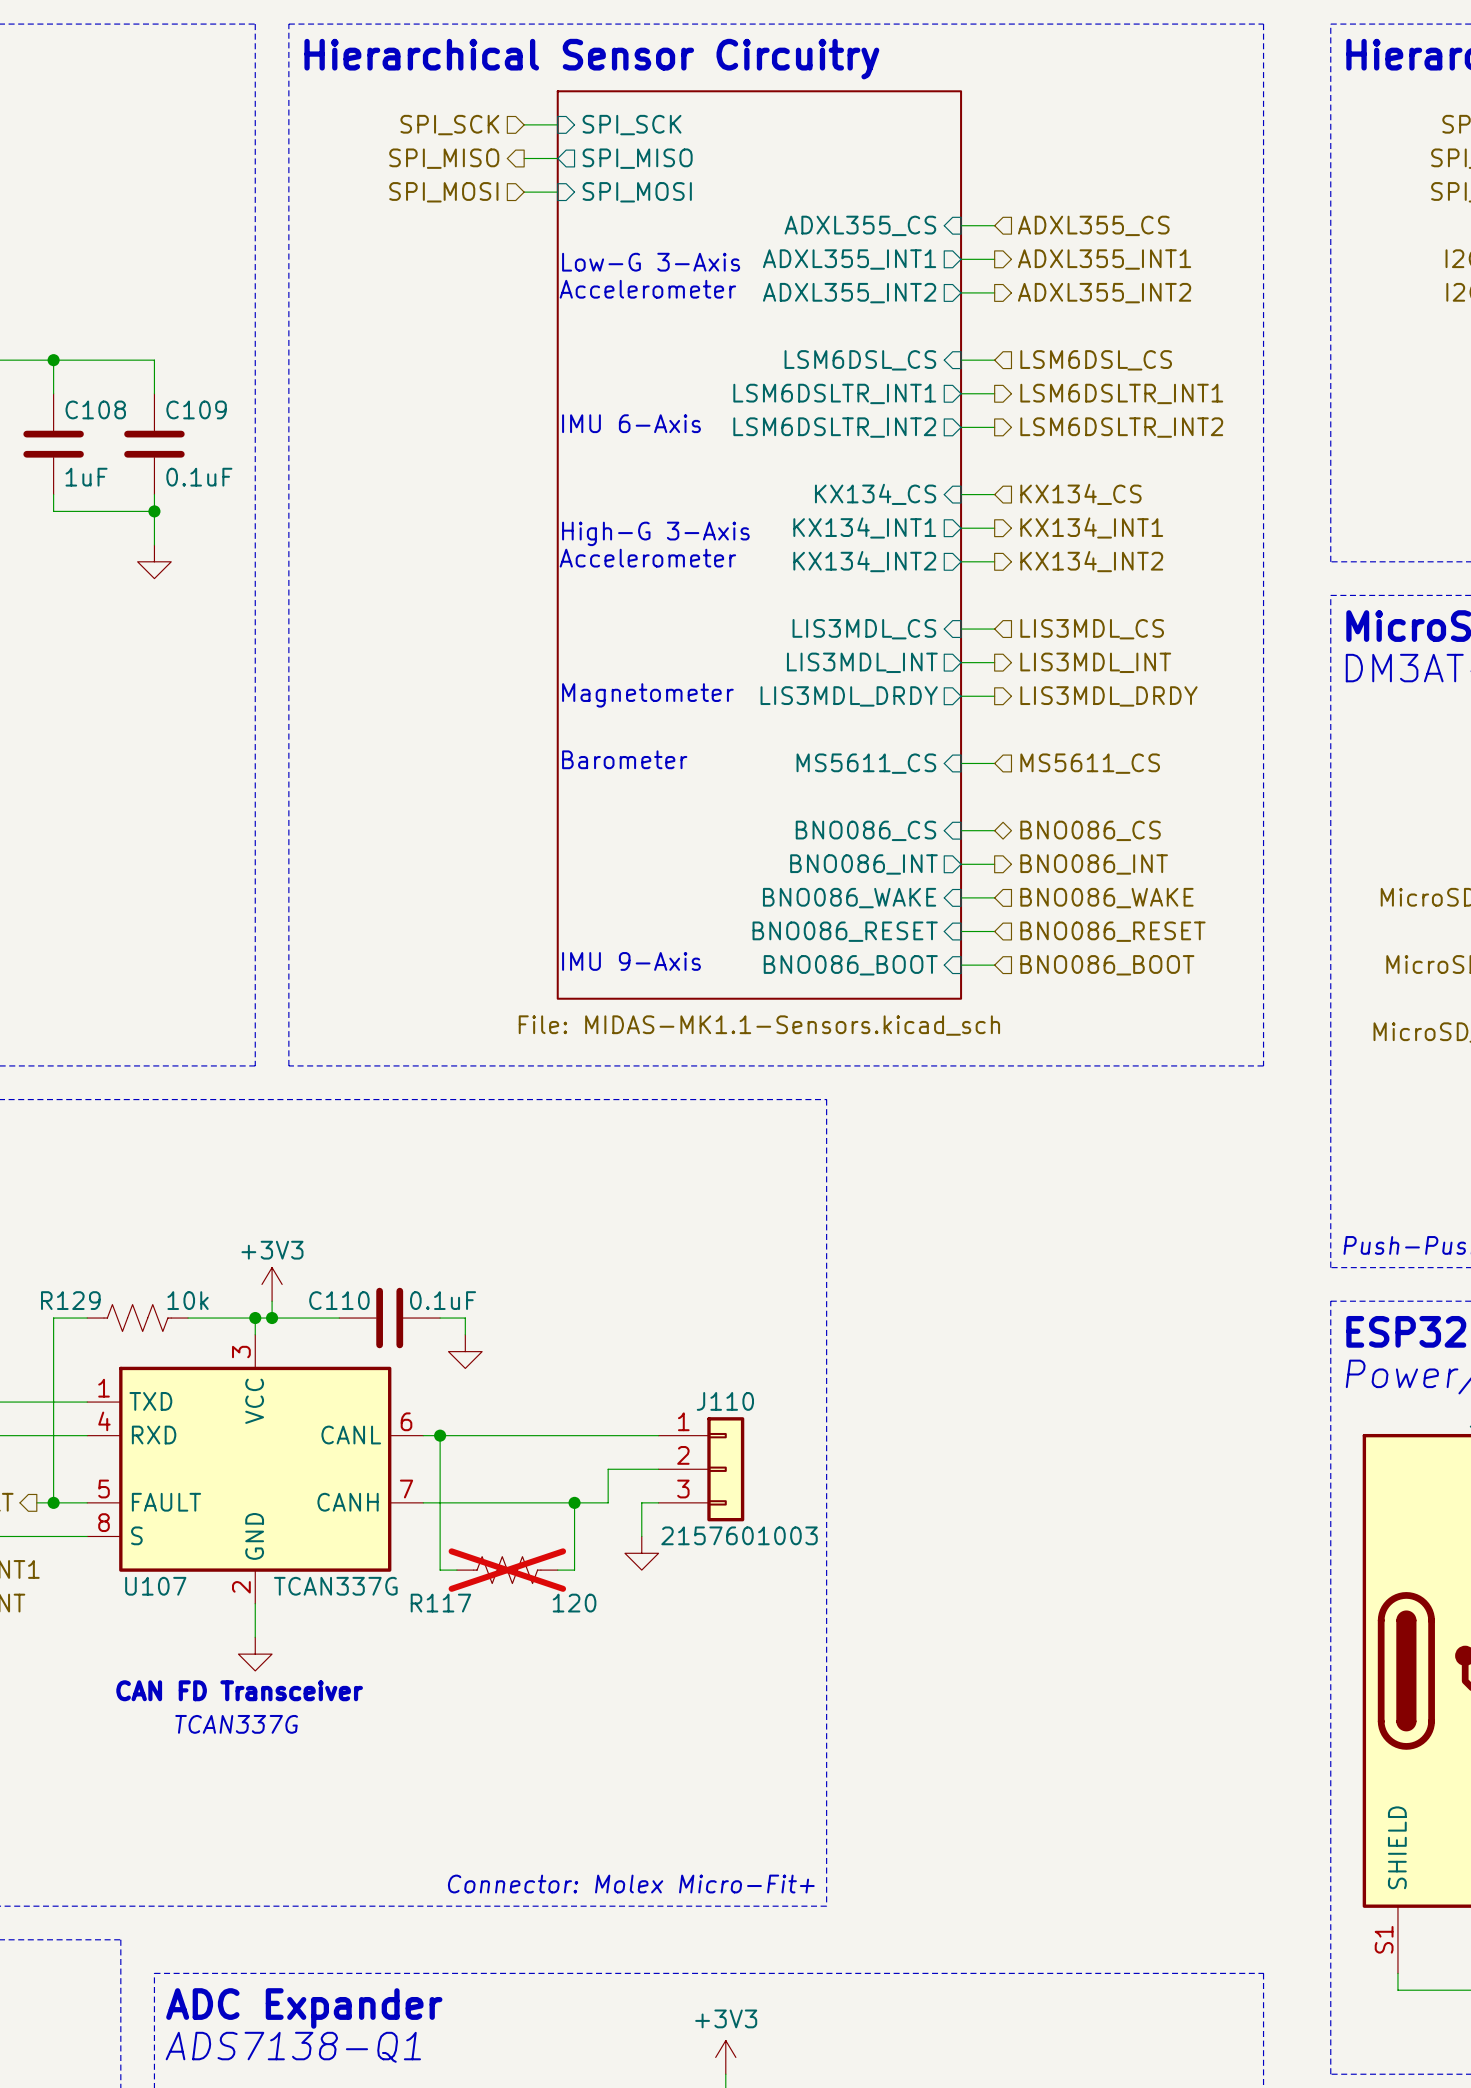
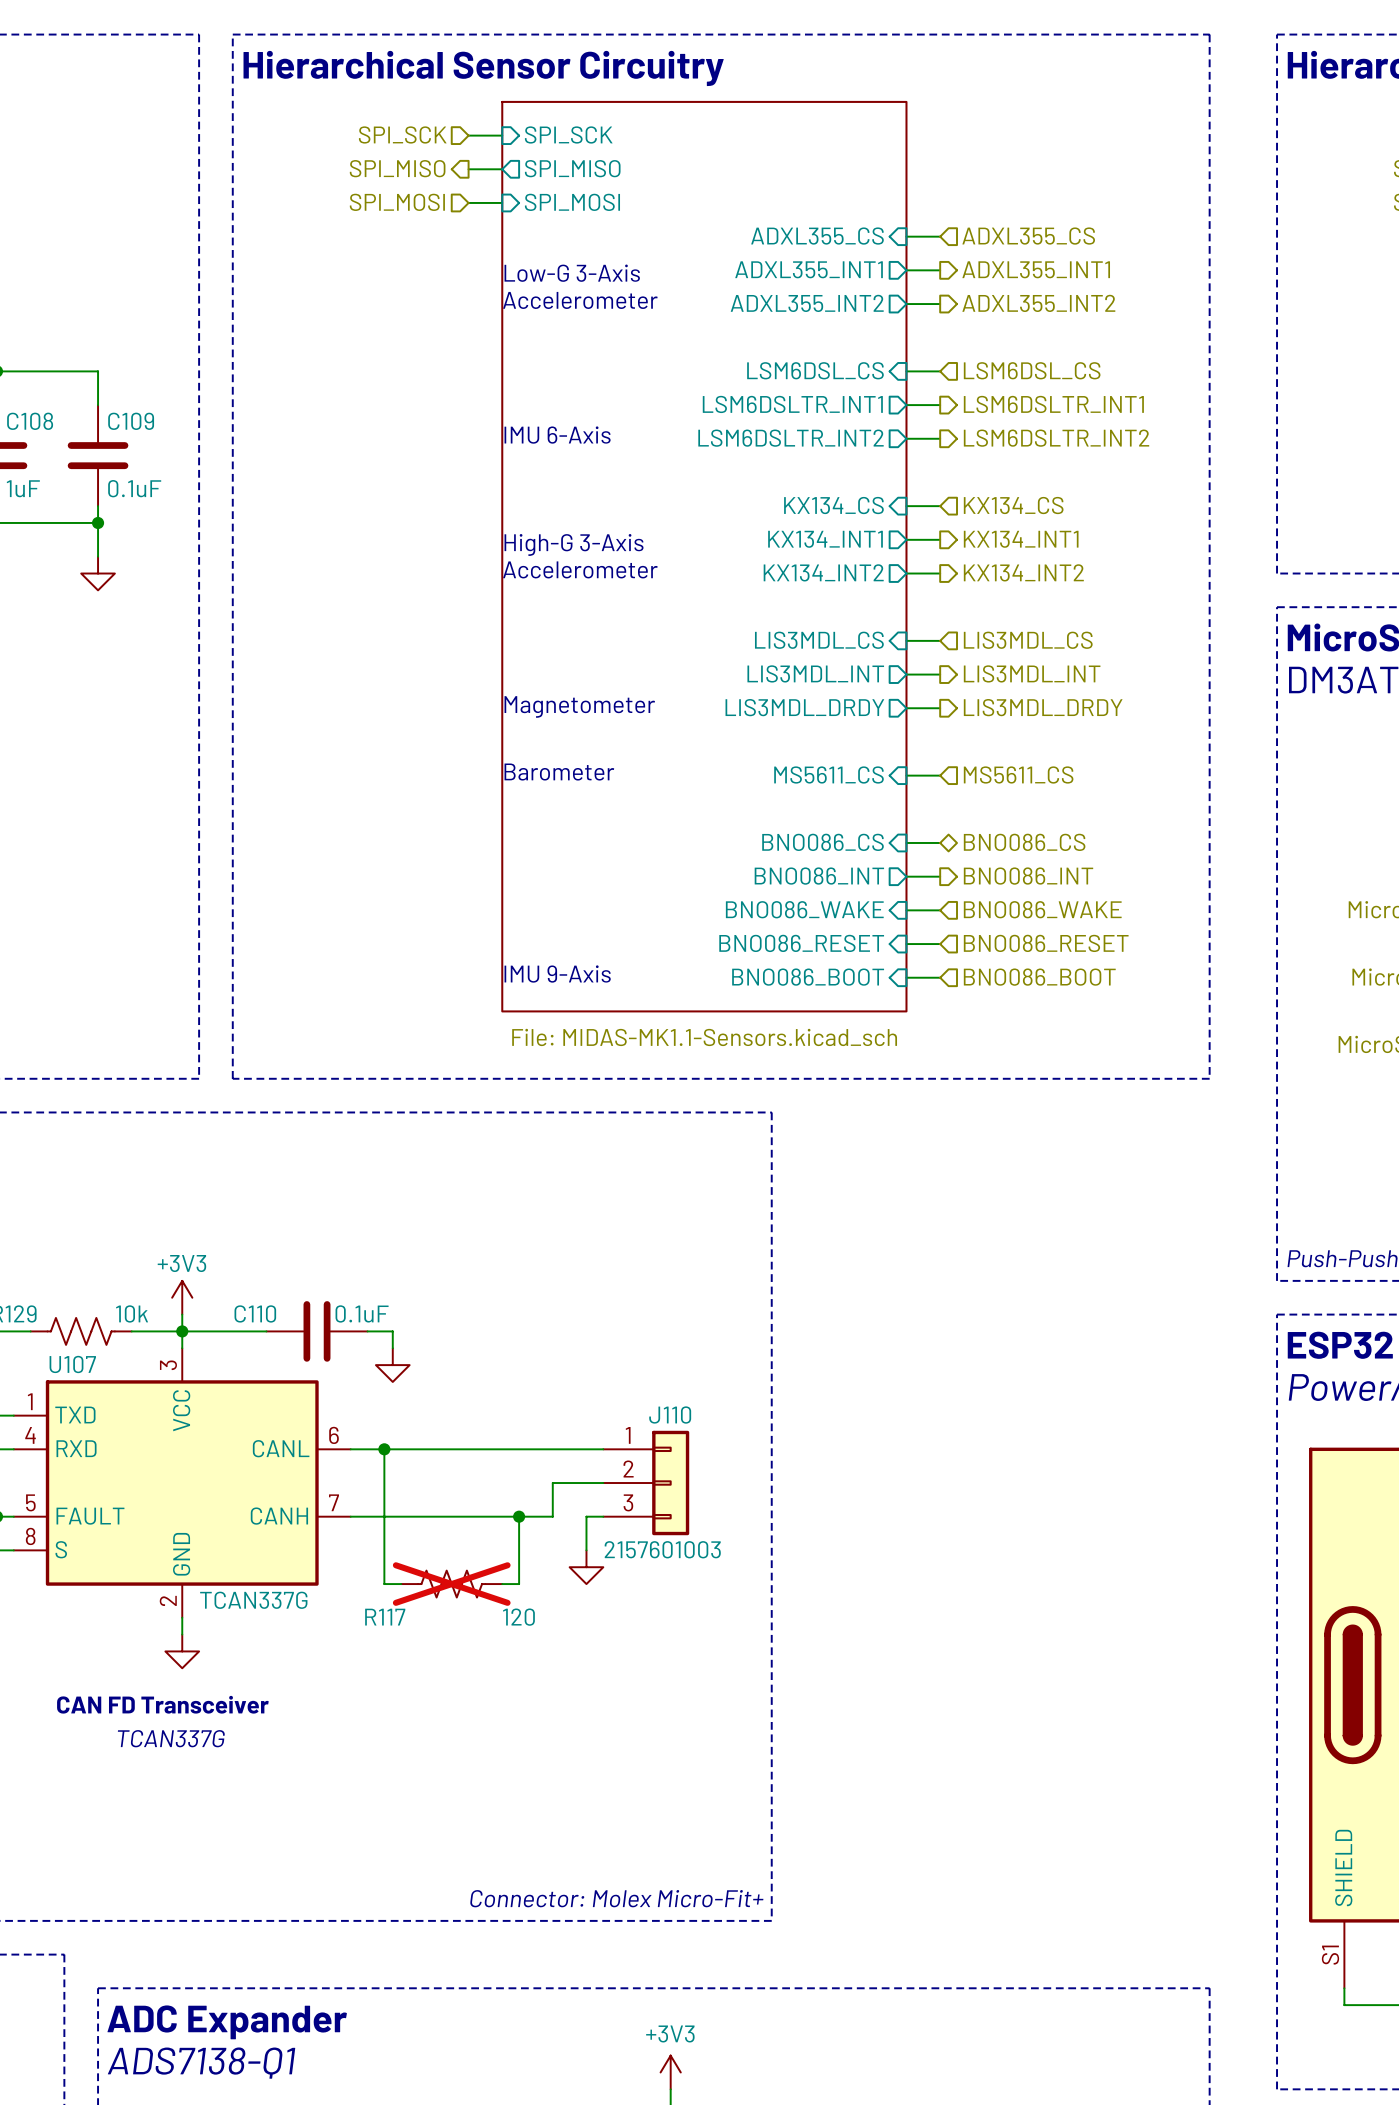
power symbol position: +3V3 (272, 1284) -> +3V3 (182, 1297)
wire: (272, 1301) (272, 1318) -> none
junction: none -> (182, 1331)
wire: (255, 1318) (255, 1334) -> (182, 1617) (182, 1634)
junction: (255, 1318) -> none
junction: (272, 1318) -> none
C110 position: (389, 1318) -> (316, 1331)
wire: (448, 1318) (465, 1318) (465, 1334) -> (392, 1331) (392, 1348)
power symbol position: (465, 1351) -> (392, 1365)
U107 position: (255, 1469) -> (182, 1483)
U107 name position: U107 (155, 1586) -> U107 (72, 1364)
wire: (255, 1603) (255, 1637) -> (182, 1314) (182, 1348)
power symbol position: (255, 1654) -> (182, 1651)

